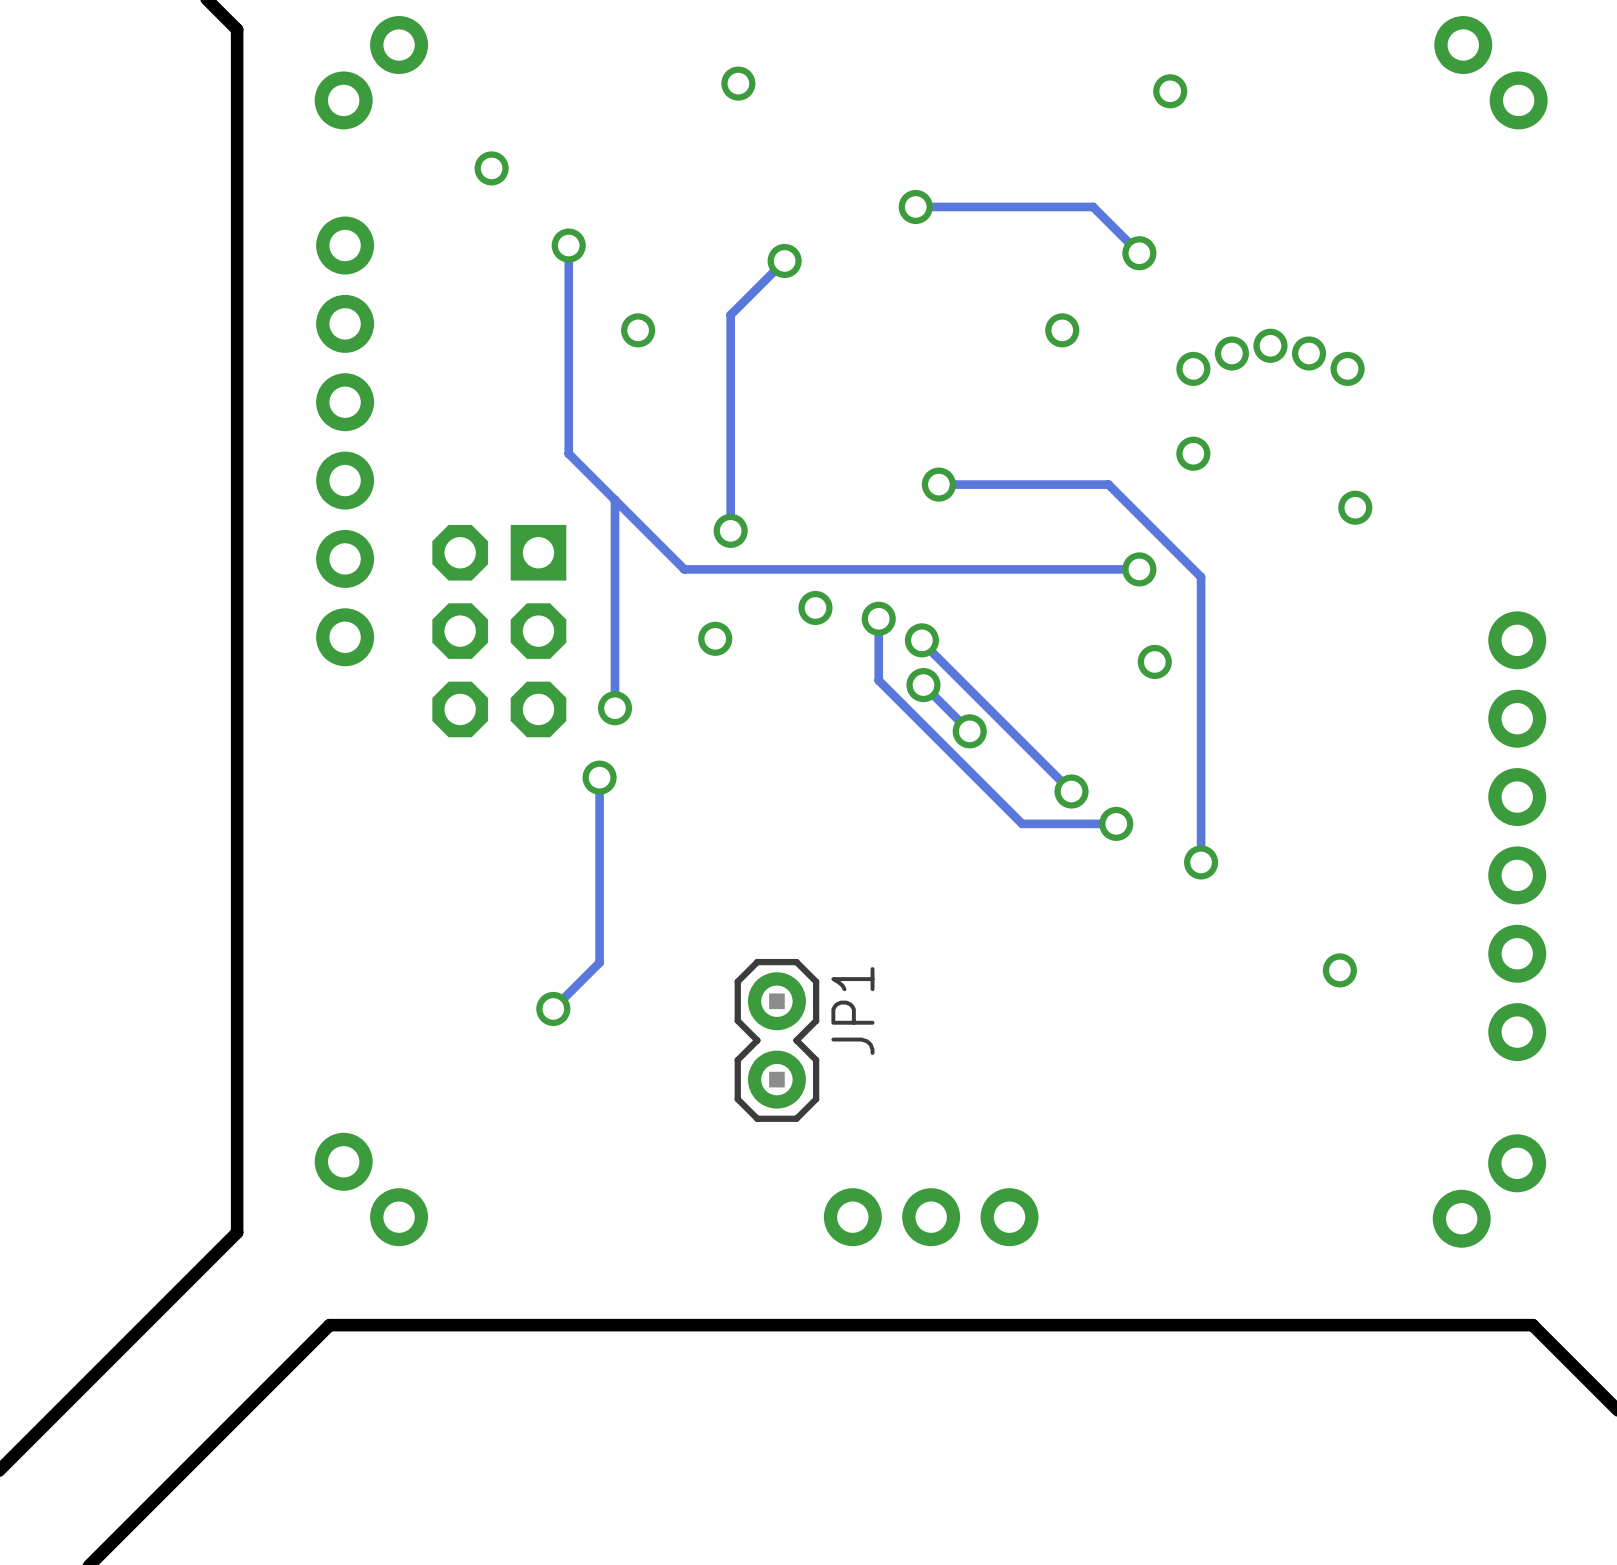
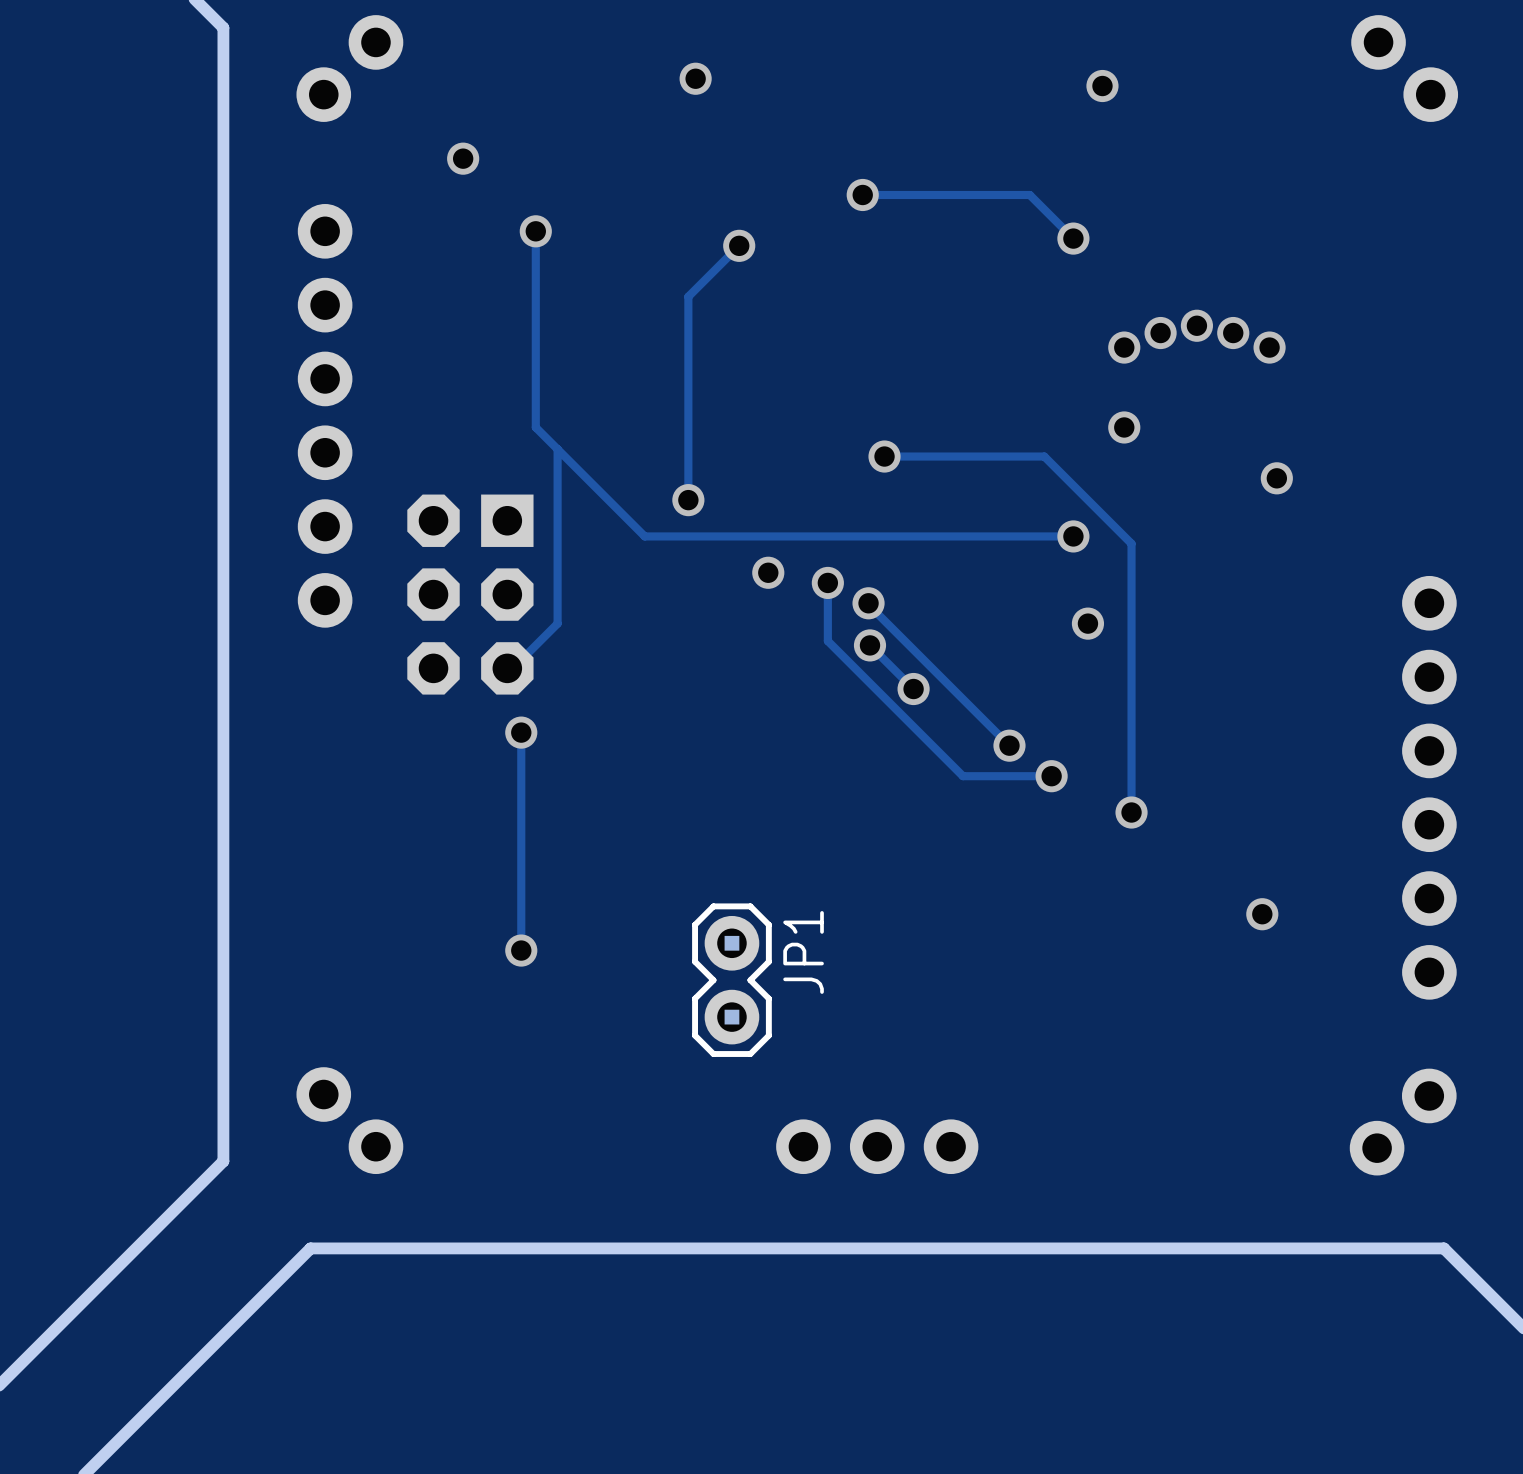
via: (638, 330) -> none
via: (1062, 330) -> none
track: none -> (557, 449) (557, 623) (512, 668) (507, 668)
track: (615, 500) (615, 708) -> none
via: (715, 638) -> none
via: (615, 708) -> none
via: none -> (521, 732)
track: (599, 777) (599, 962) (553, 1008) -> (521, 732) (521, 950)
via: (599, 777) -> none

